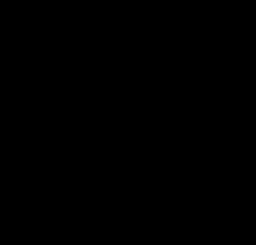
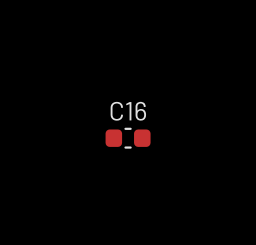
C16: none -> (128, 138)

